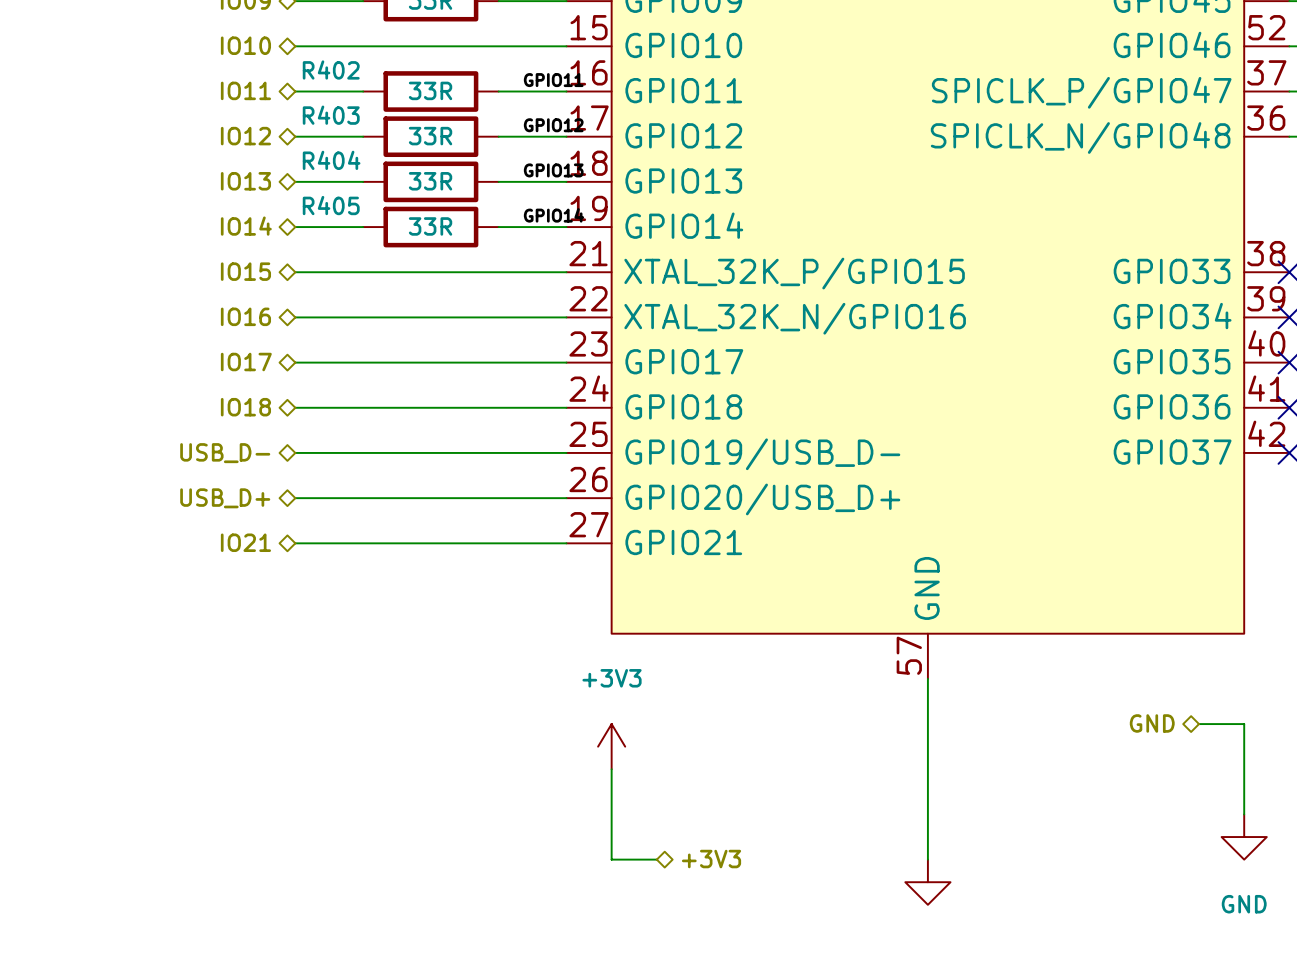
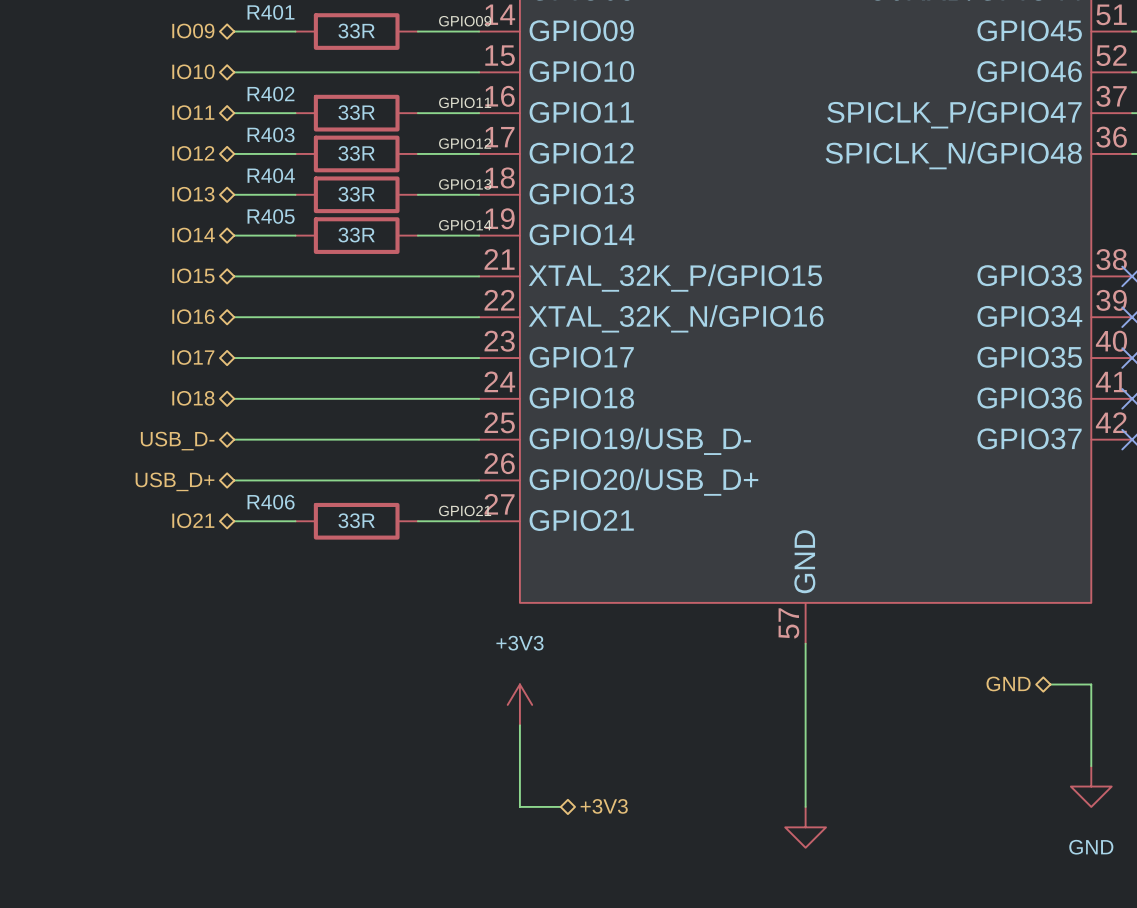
label: none -> GPIO21 (465, 510)
wire: (363, 543) (498, 543) -> none
R406: none -> 33R (356, 521)

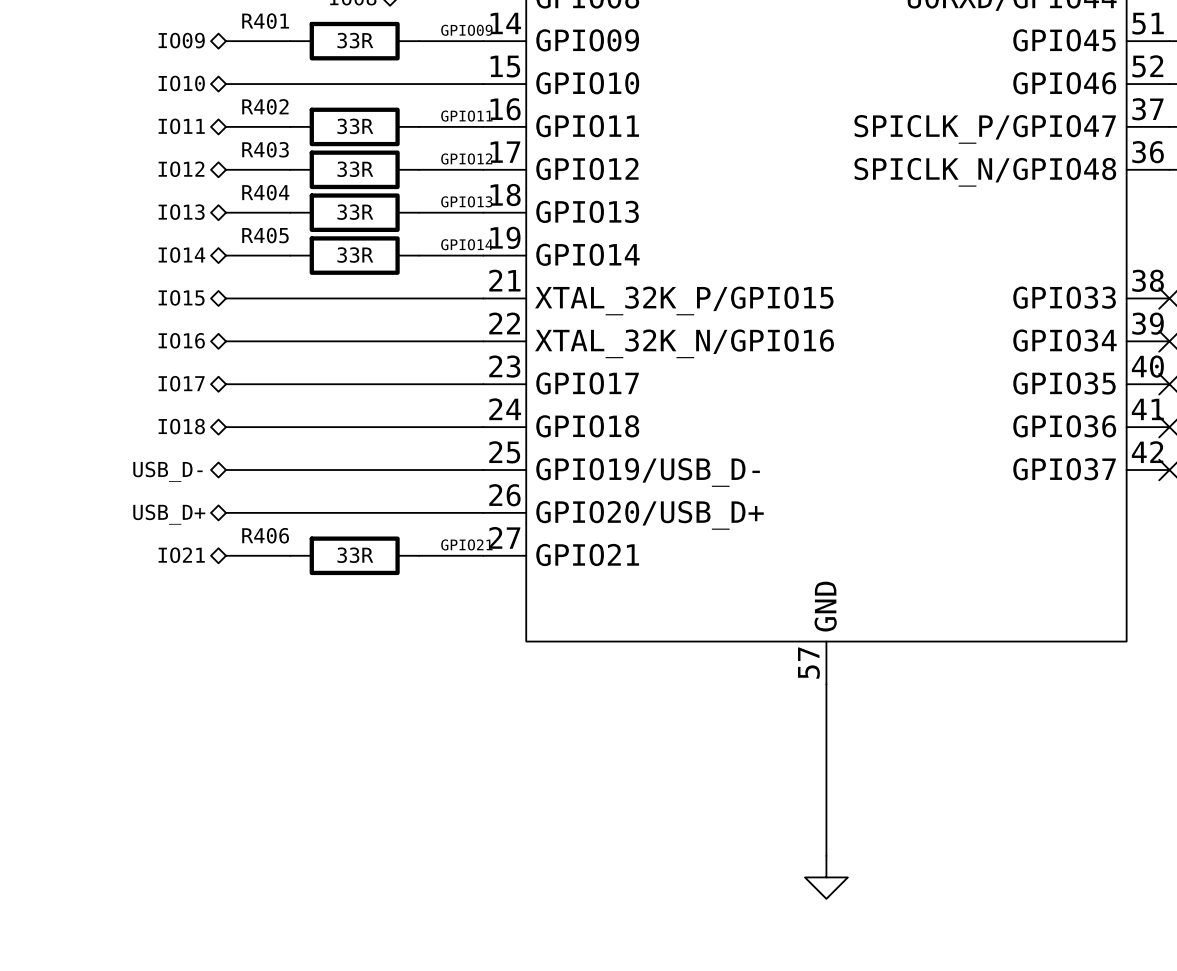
hierarchical label: GND (1008, 683) -> none
wire: (1050, 684) (1091, 684) (1091, 766) -> none
power symbol: +3V3 (519, 704) -> none
wire: (519, 725) (519, 806) (560, 806) -> none
power symbol: GND (1091, 786) -> none
hierarchical label: +3V3 (604, 806) -> none

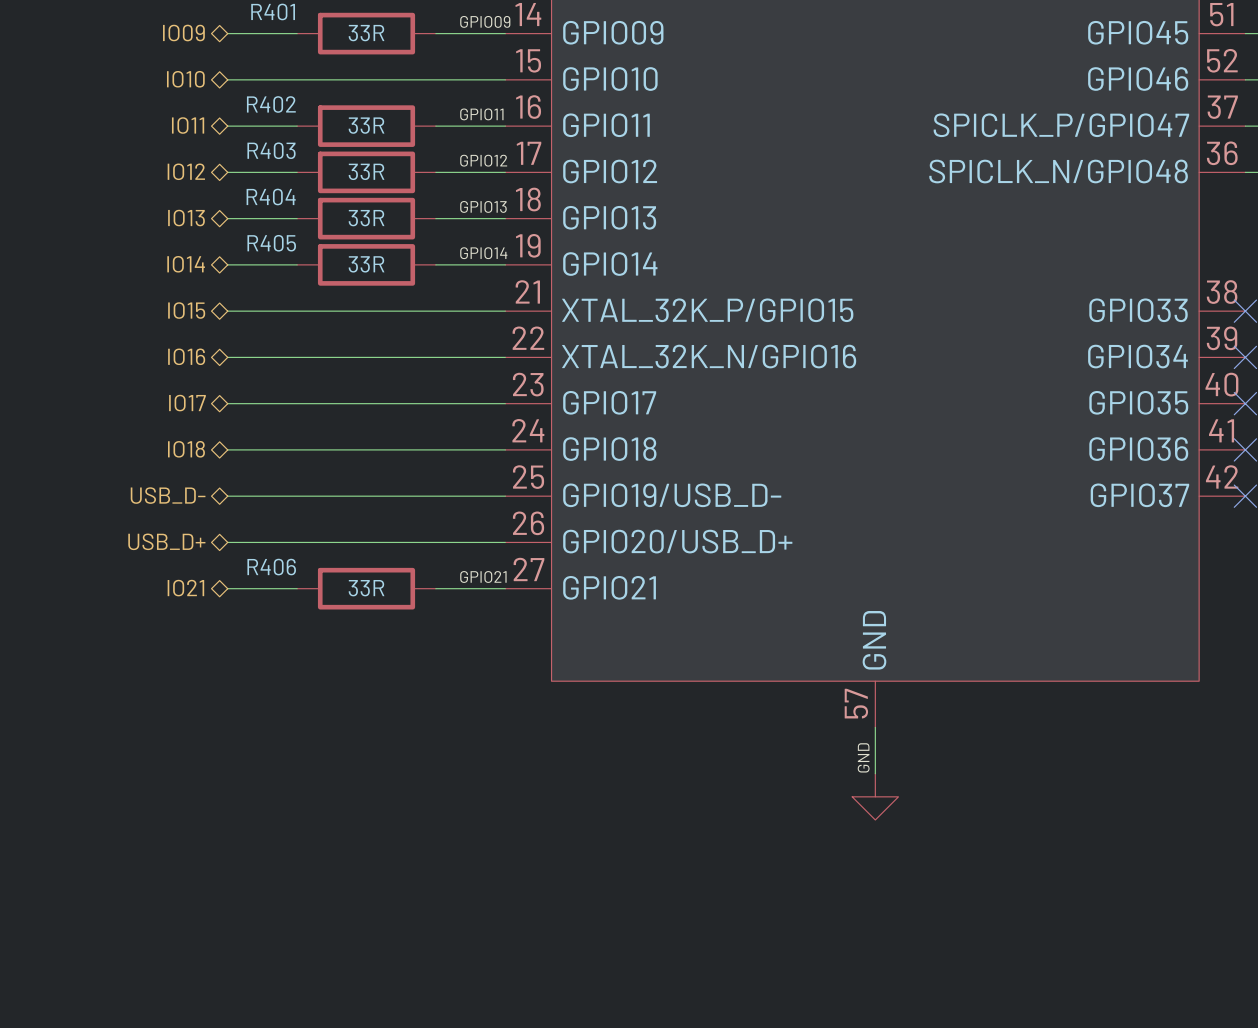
label: none -> GND (863, 757)
wire: (826, 727) (826, 855) -> none
part: none -> (875, 796)
power symbol: (826, 877) -> none

